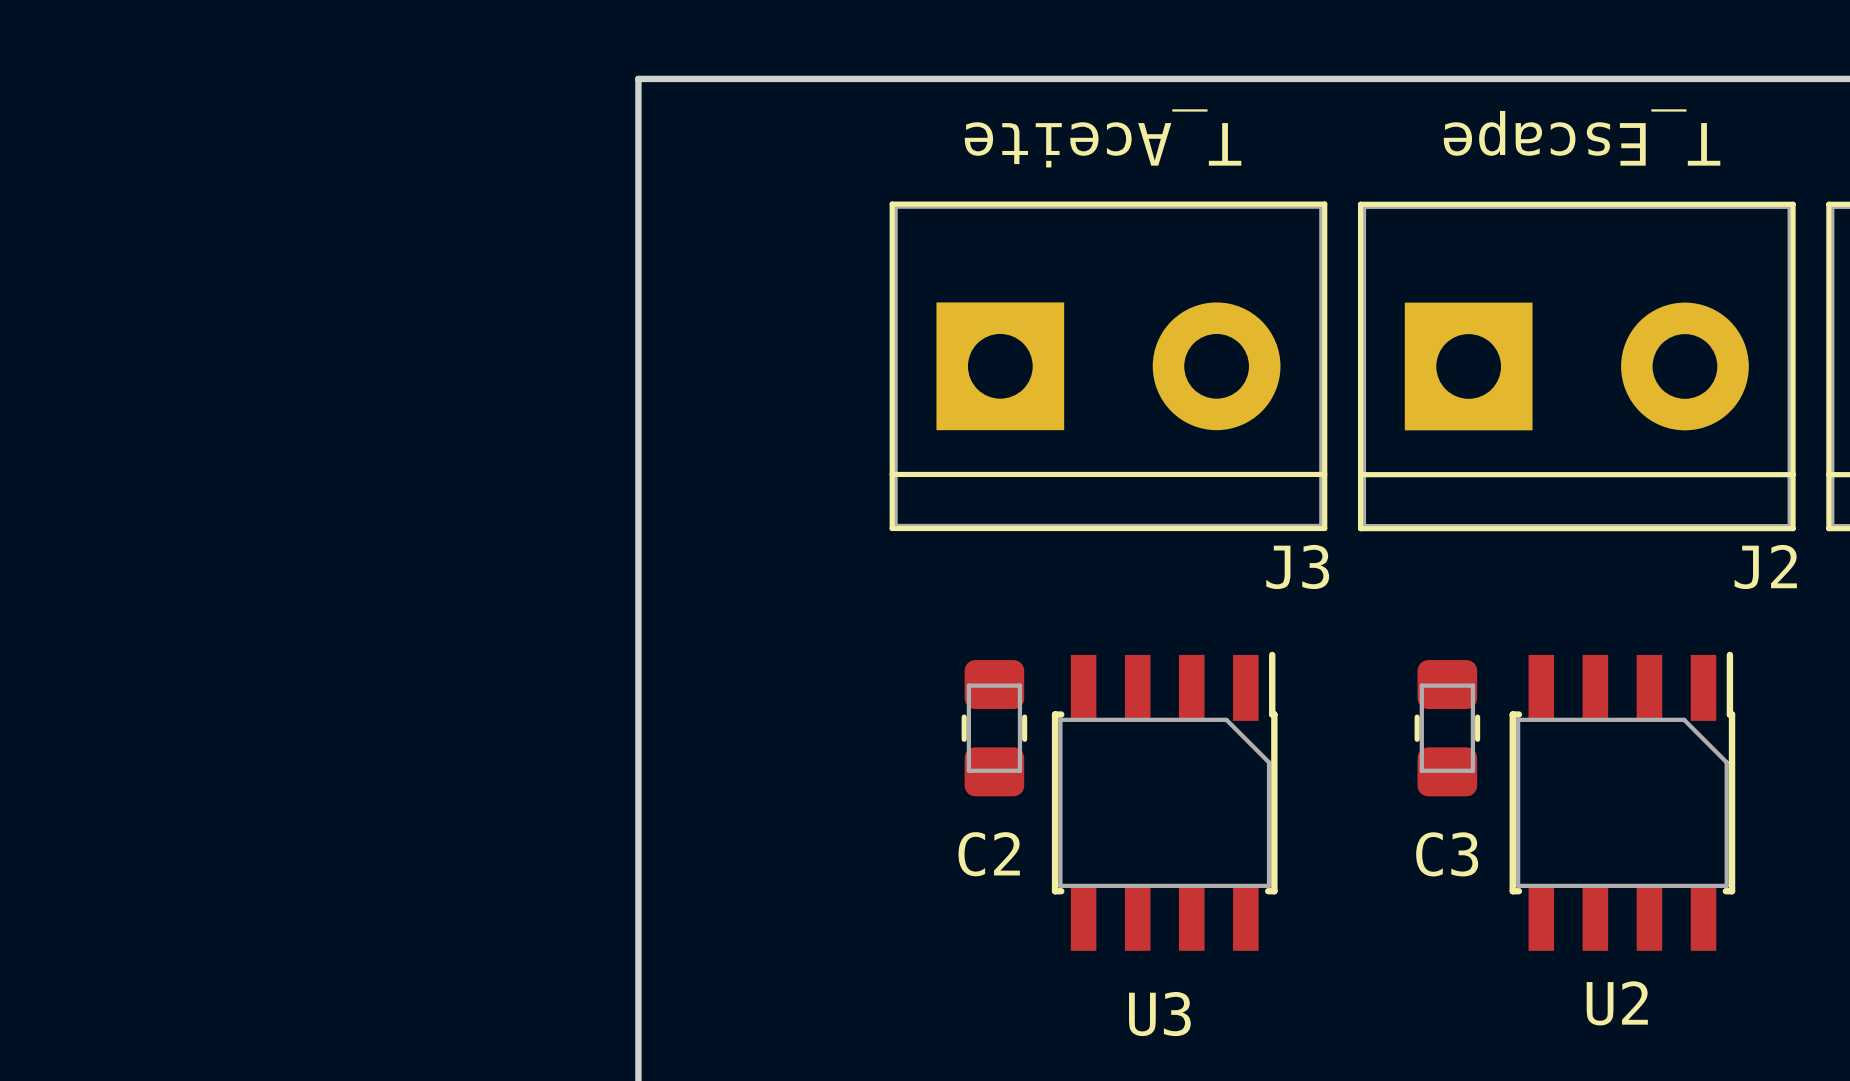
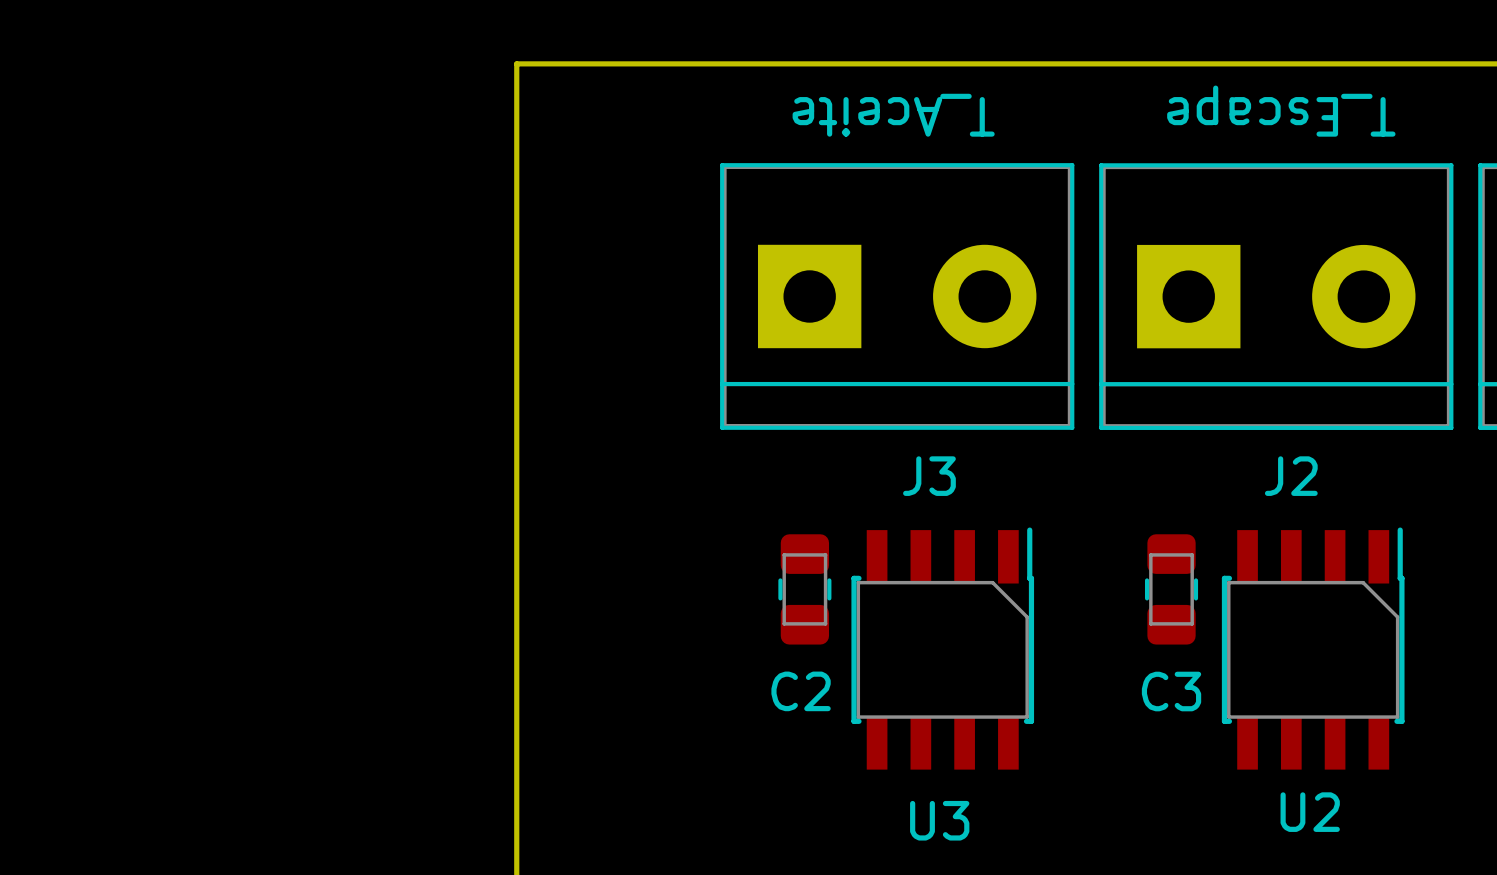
J3 name position: J3 (1297, 566) -> J3 (929, 476)
J2 name position: J2 (1765, 566) -> J2 (1291, 476)

